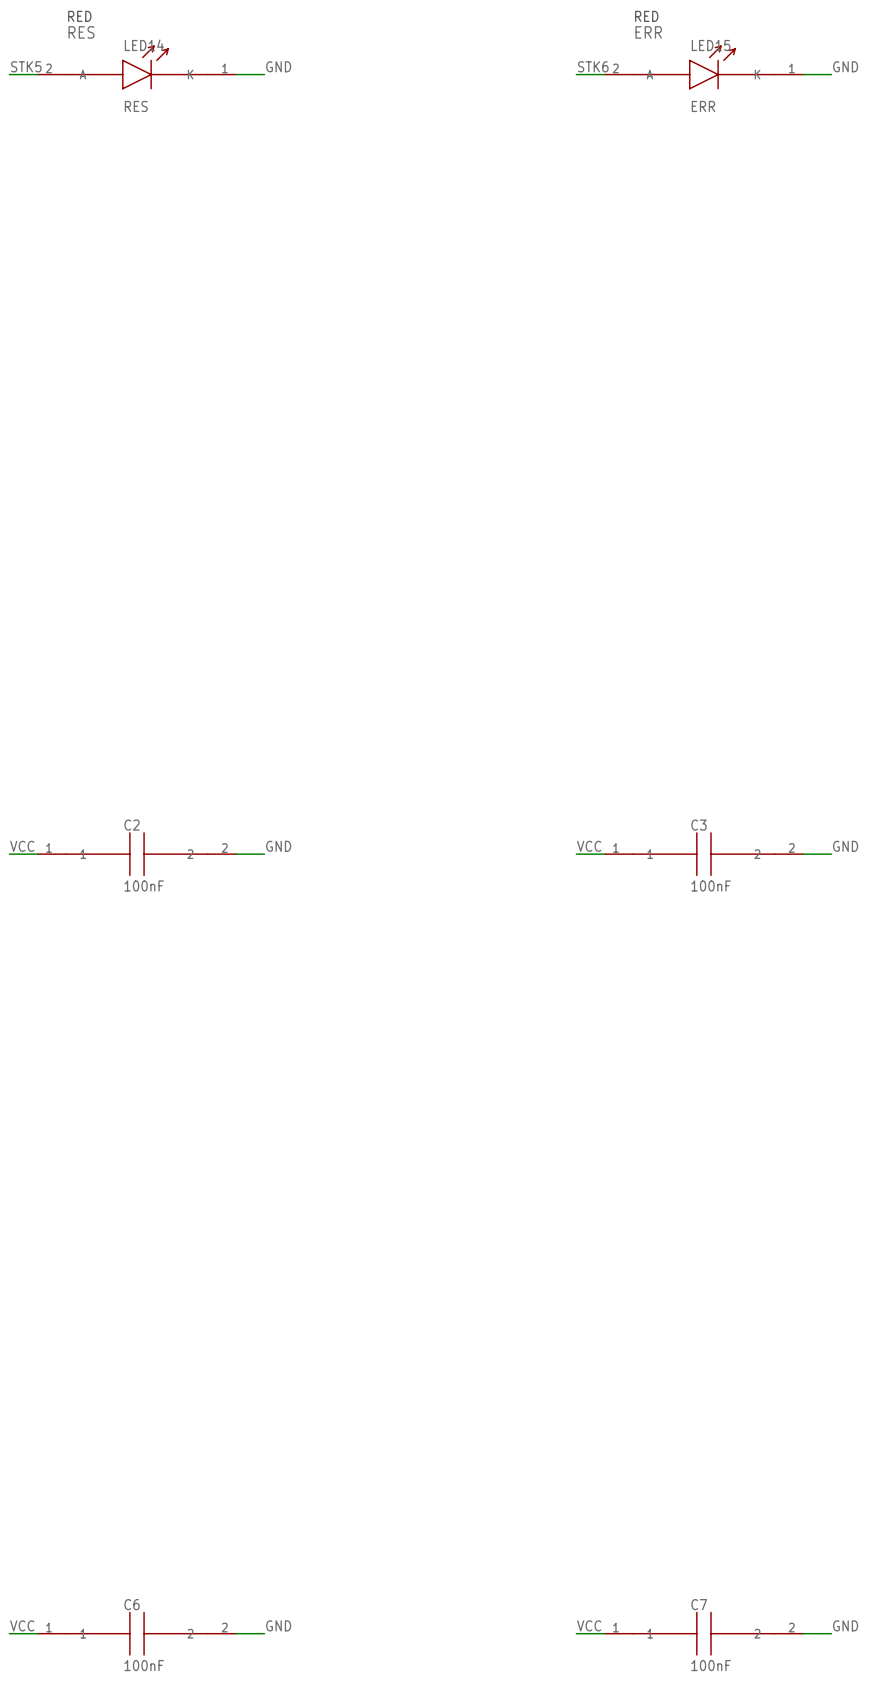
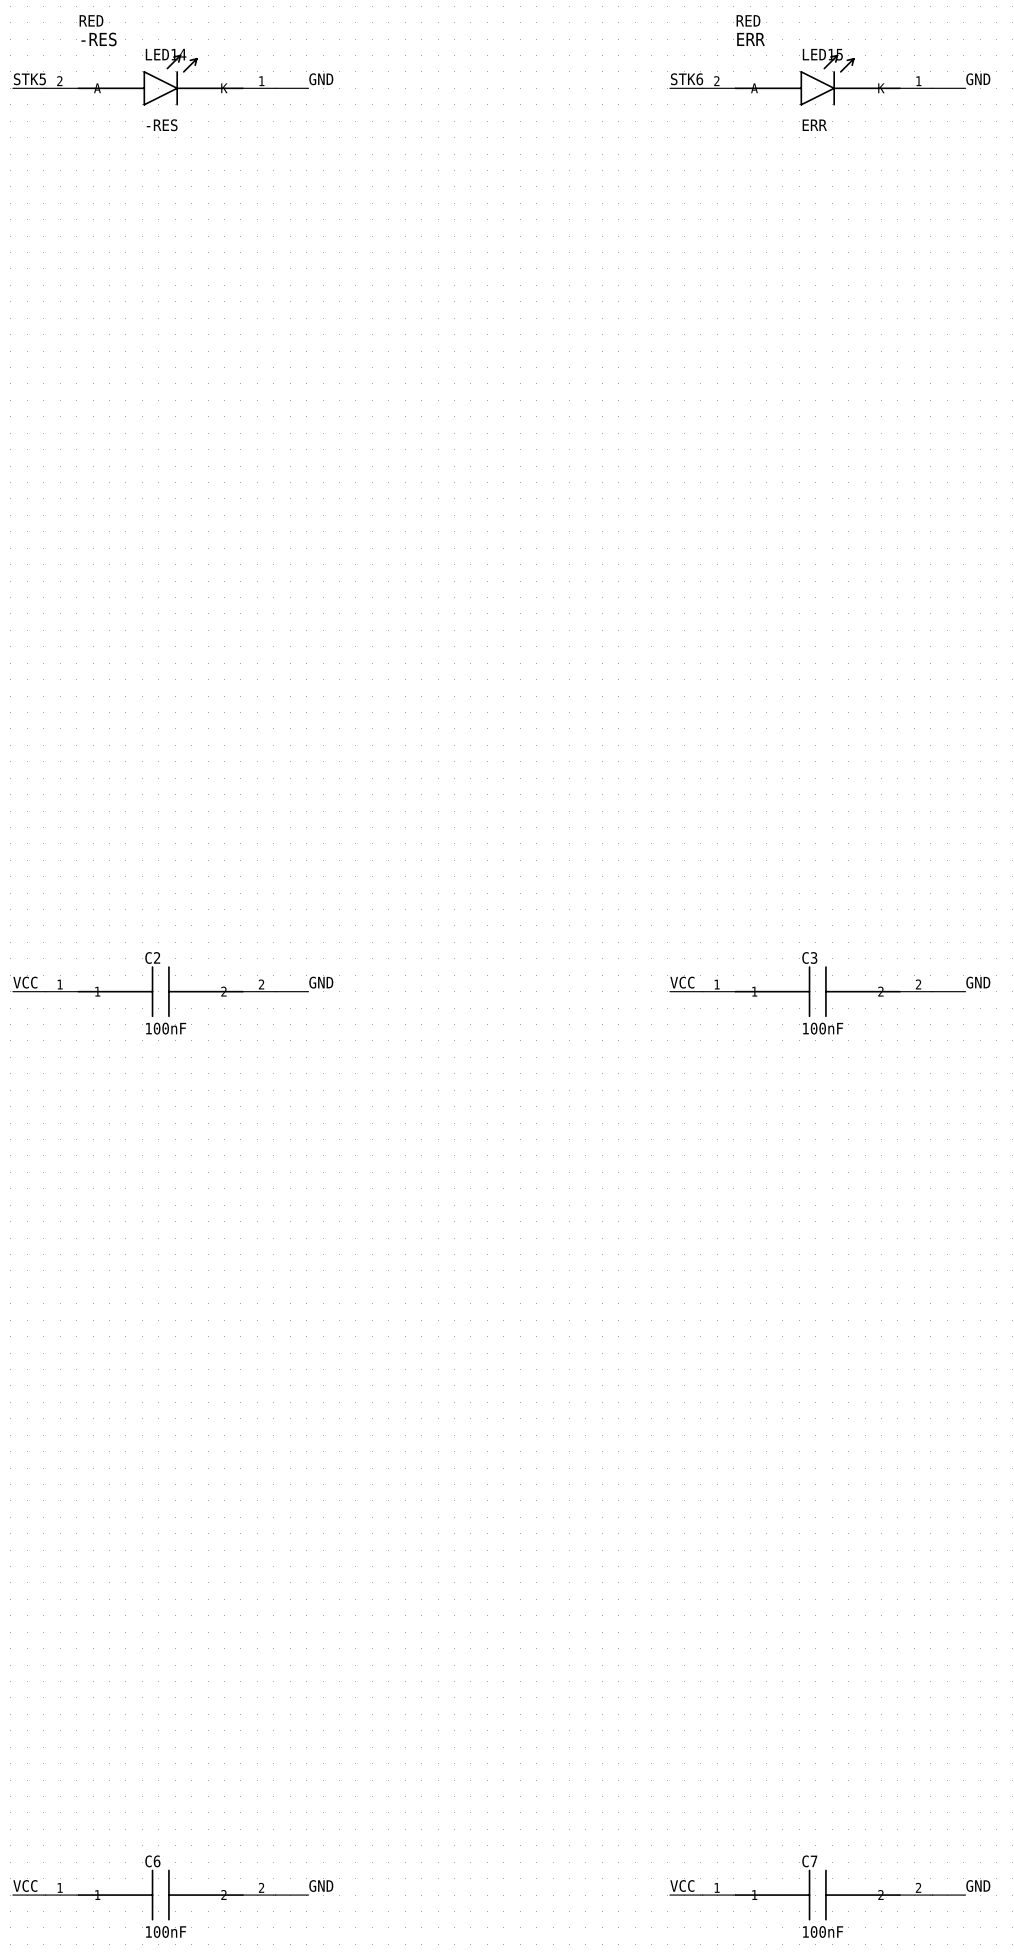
text: RES (81, 32) -> -RES (99, 39)
LED14 value: RES (136, 106) -> -RES (162, 125)

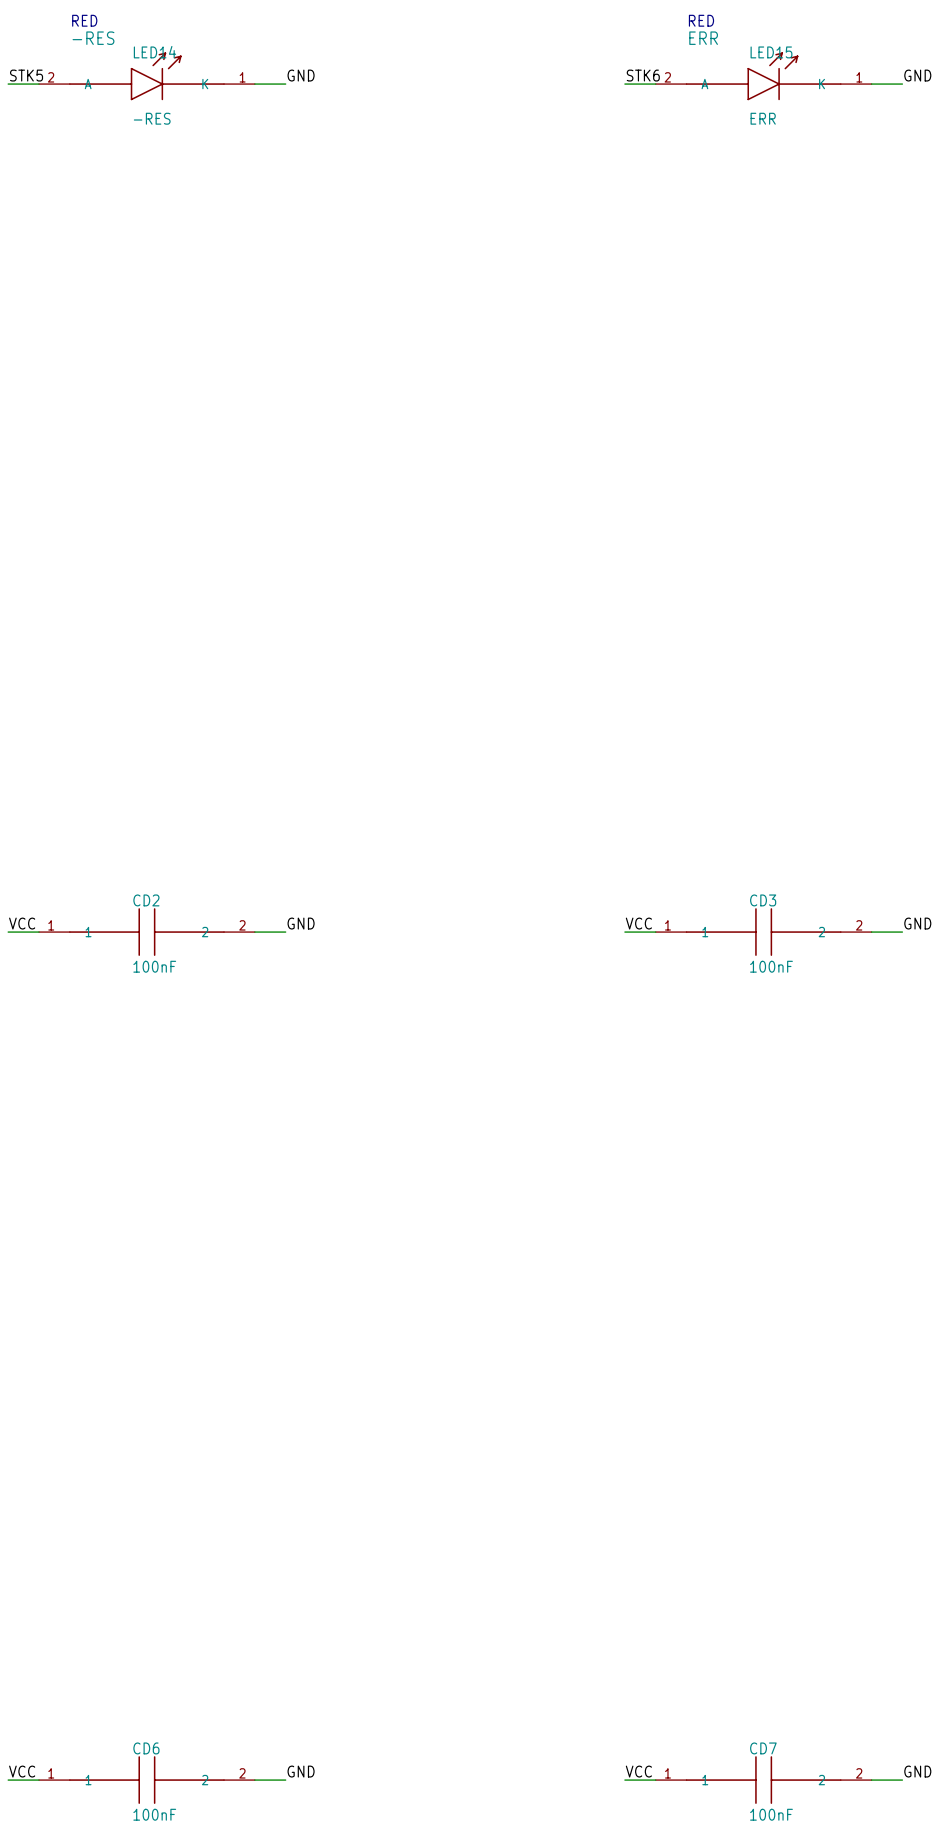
C2 name: C2 (152, 958) -> CD2 (146, 900)
C3 name: C3 (809, 958) -> CD3 (763, 900)
C6 name: C6 (152, 1861) -> CD6 (146, 1748)
C7 name: C7 (809, 1861) -> CD7 (763, 1748)

